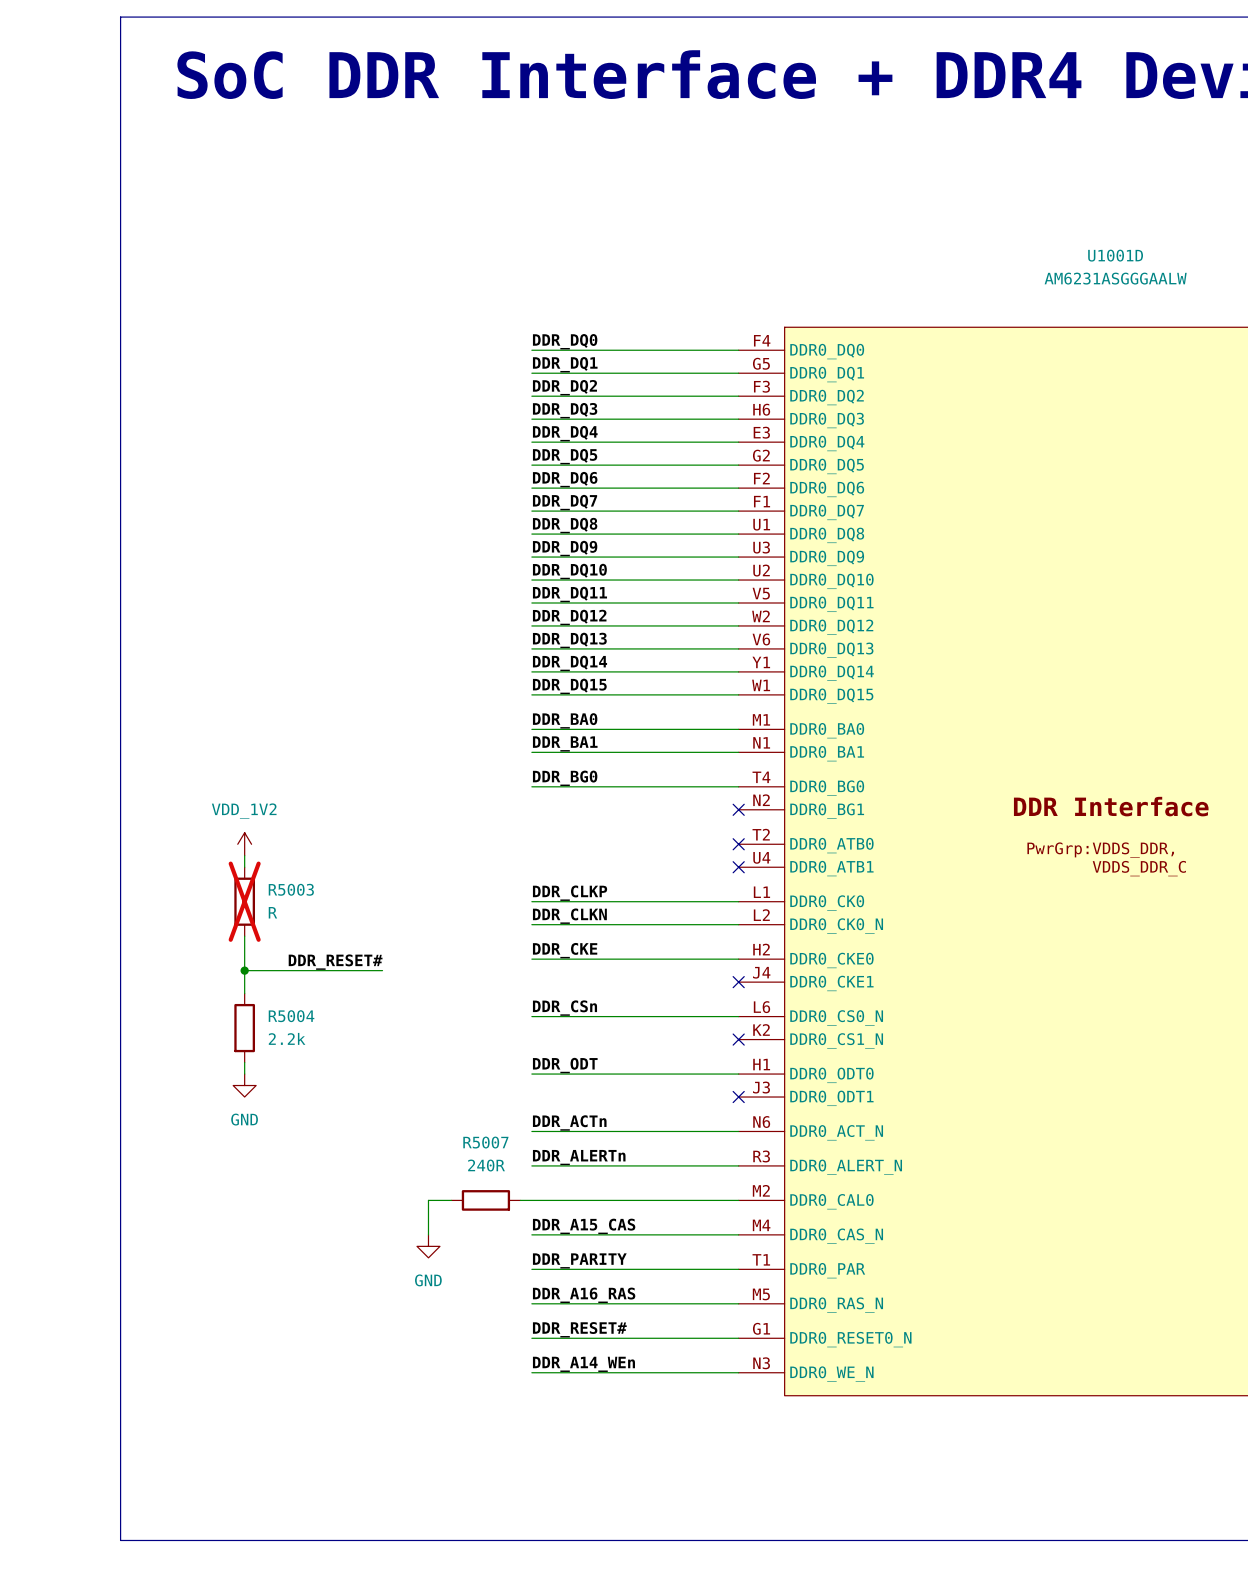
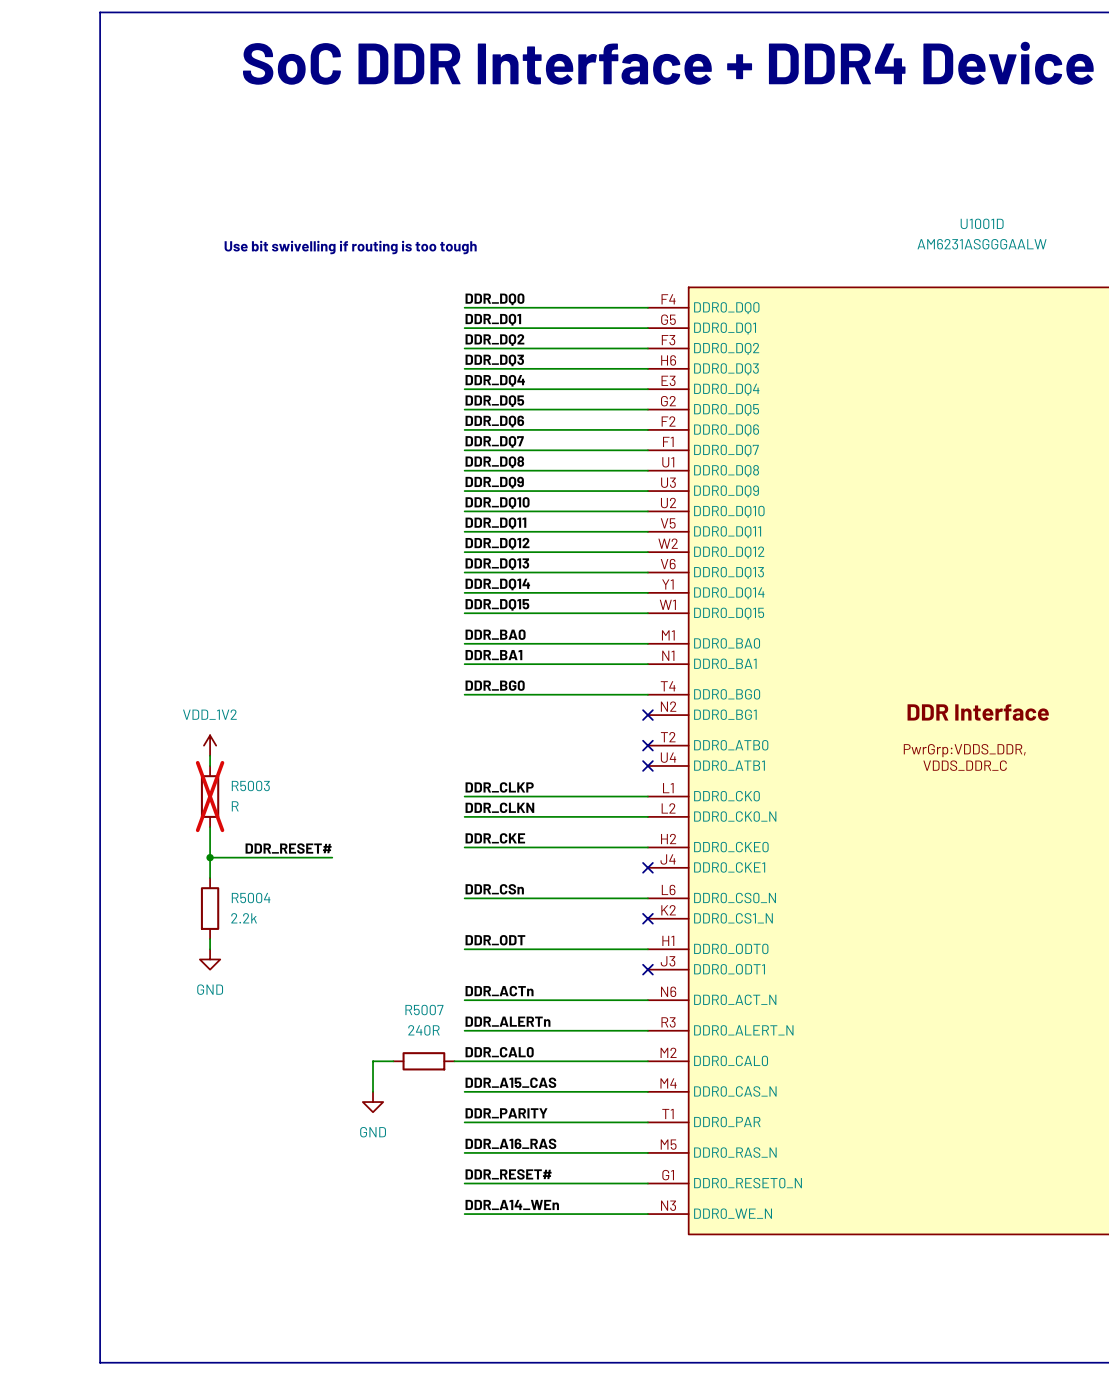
text: none -> Use bit swivelling if routing is too tough (350, 247)
label: none -> DDR_CAL0 (499, 1052)

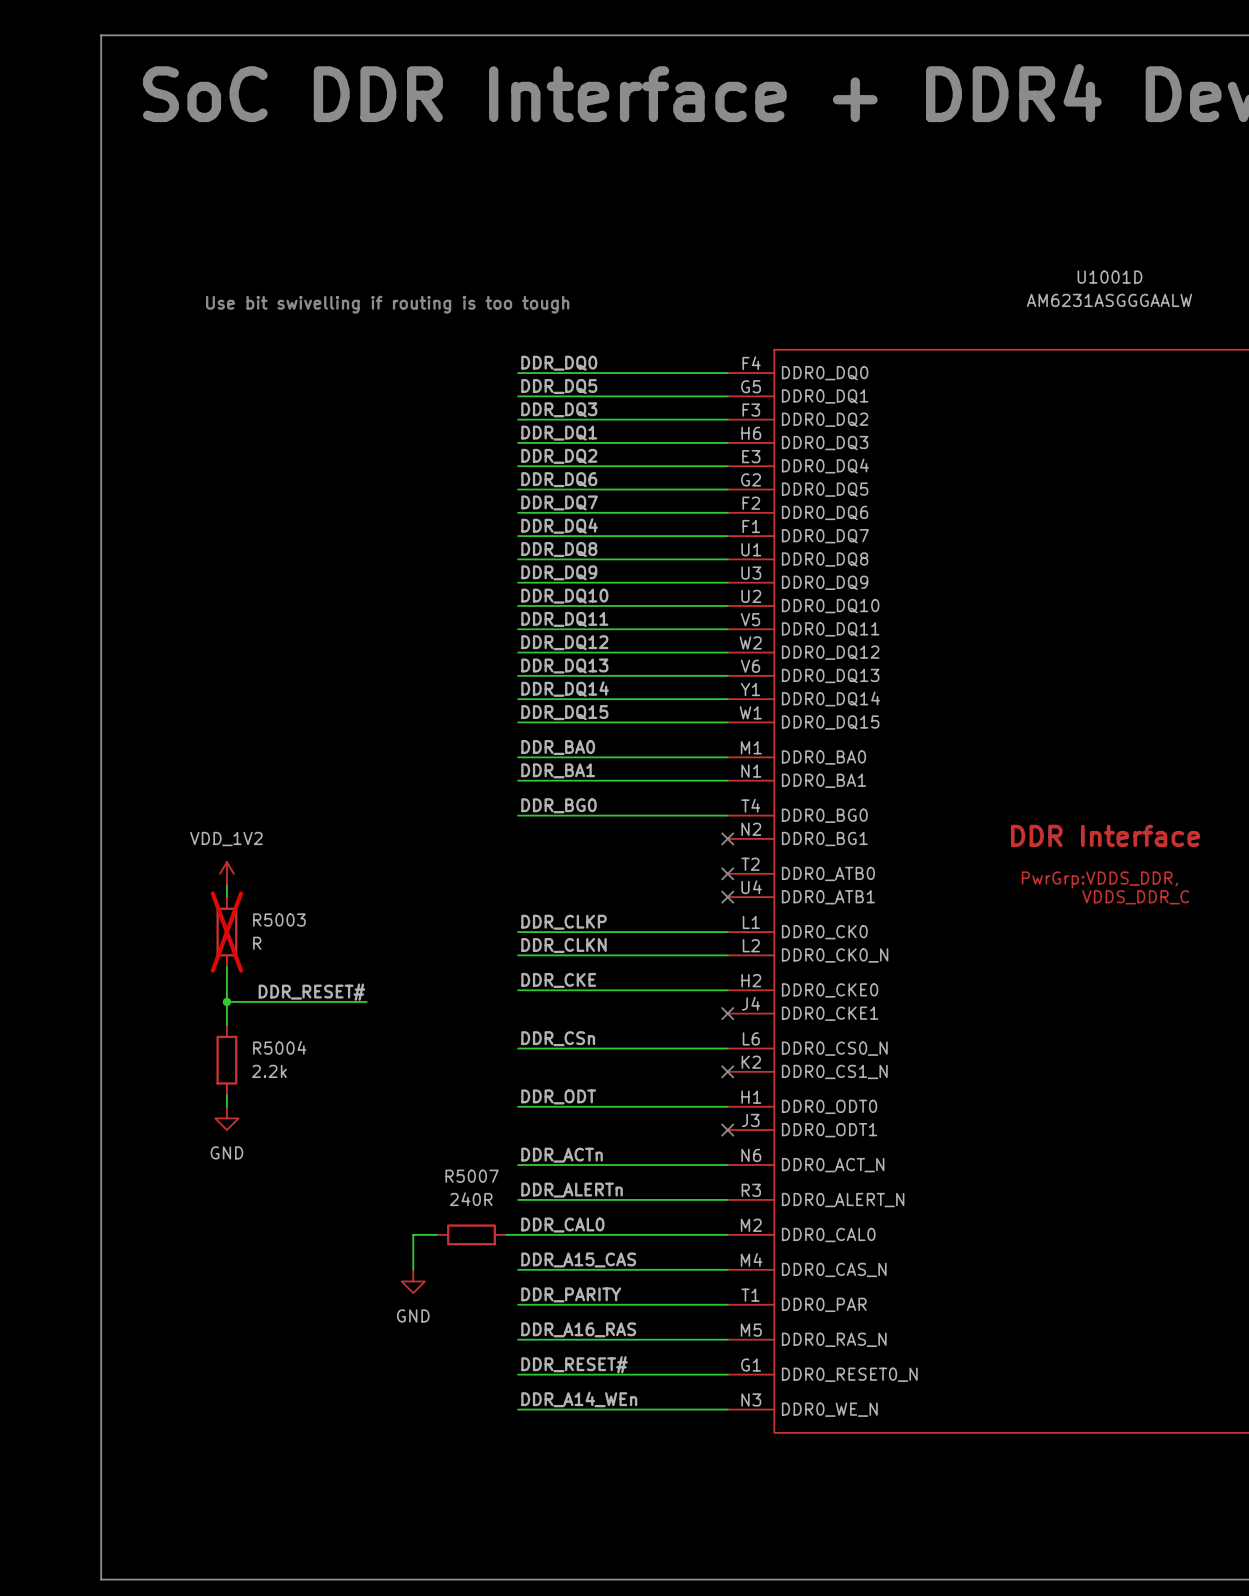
label: DDR_DQ1 (493, 319) -> DDR_DQ5 (559, 386)
label: DDR_DQ2 (494, 340) -> DDR_DQ3 (559, 409)
label: DDR_DQ3 (494, 360) -> DDR_DQ1 (559, 433)
label: DDR_DQ4 (495, 380) -> DDR_DQ2 (559, 456)
label: DDR_DQ5 (494, 401) -> DDR_DQ6 (559, 479)
label: DDR_DQ6 (494, 421) -> DDR_DQ7 (559, 502)
label: DDR_DQ7 (494, 441) -> DDR_DQ4 (559, 525)

